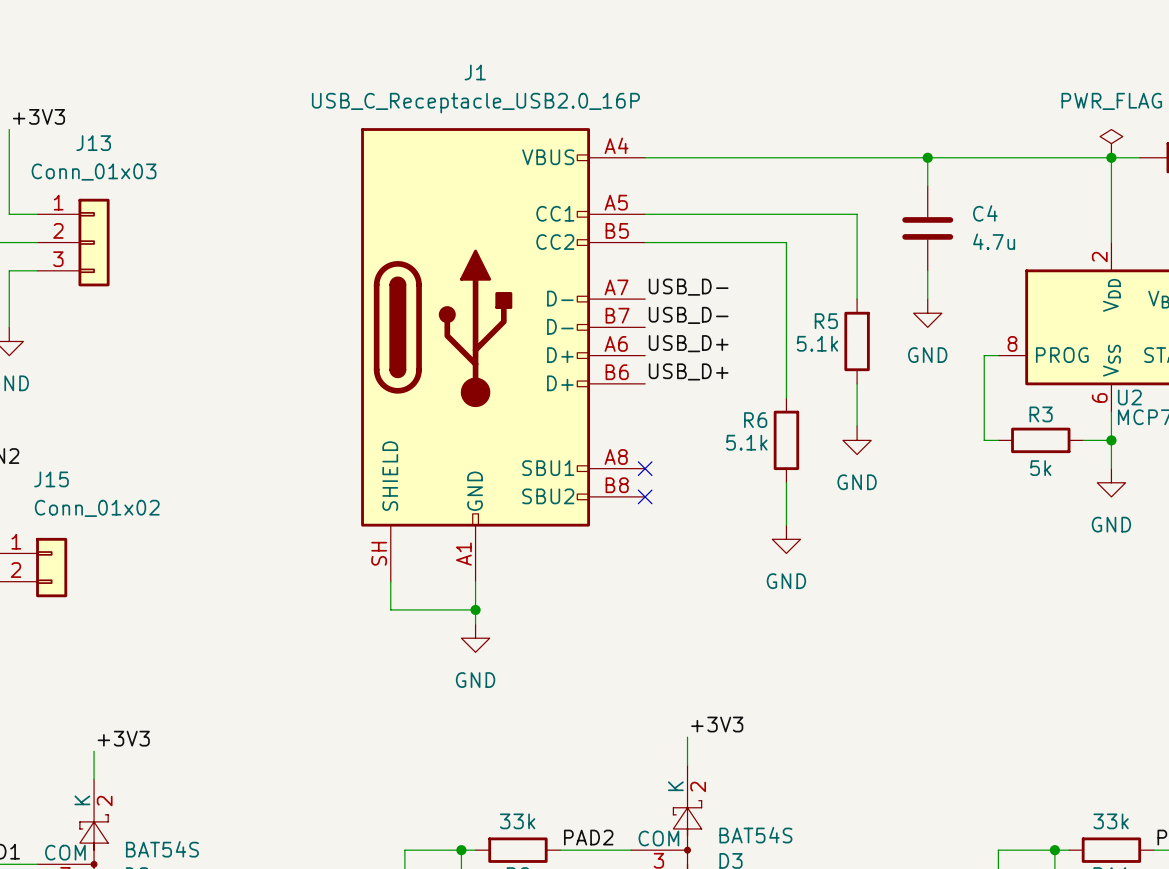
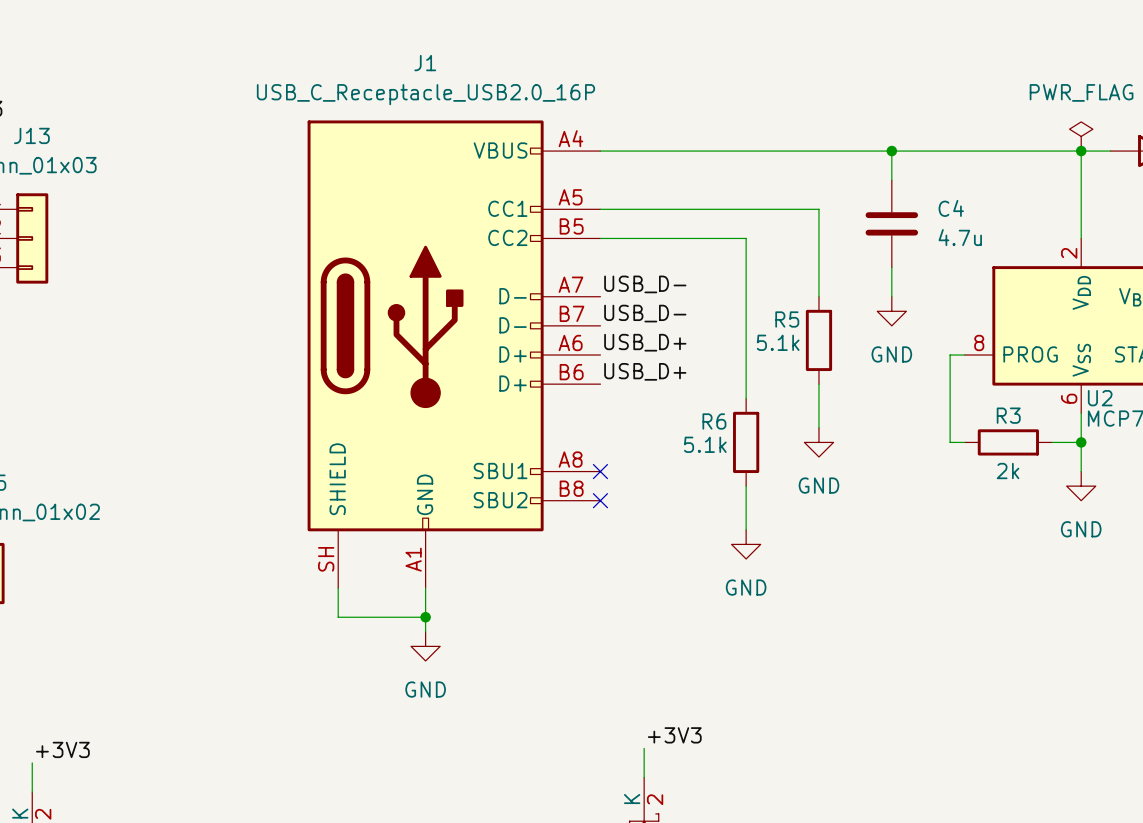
R3 value: 5k (1040, 468) -> 2k (1008, 471)

